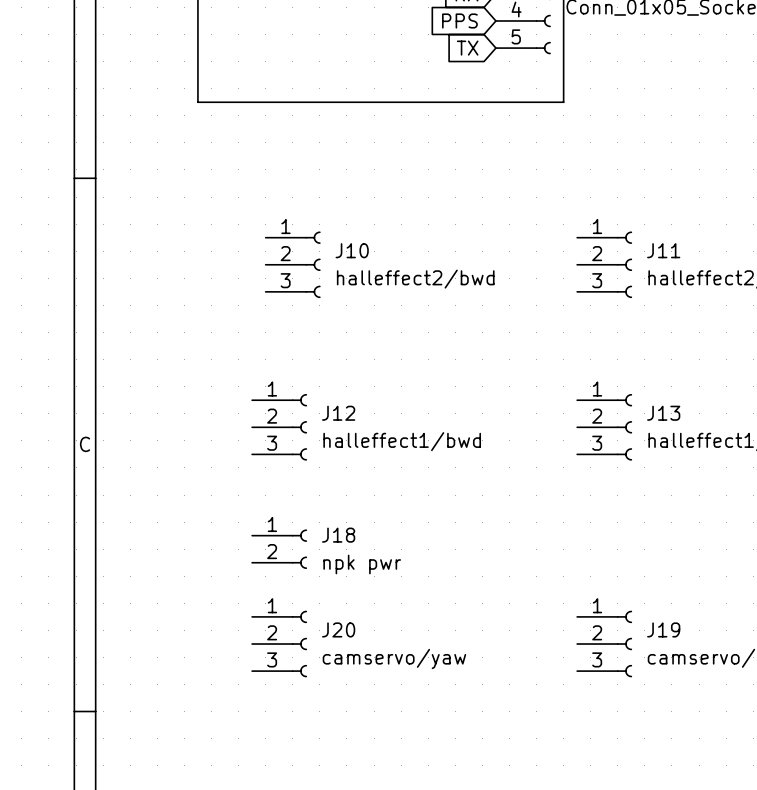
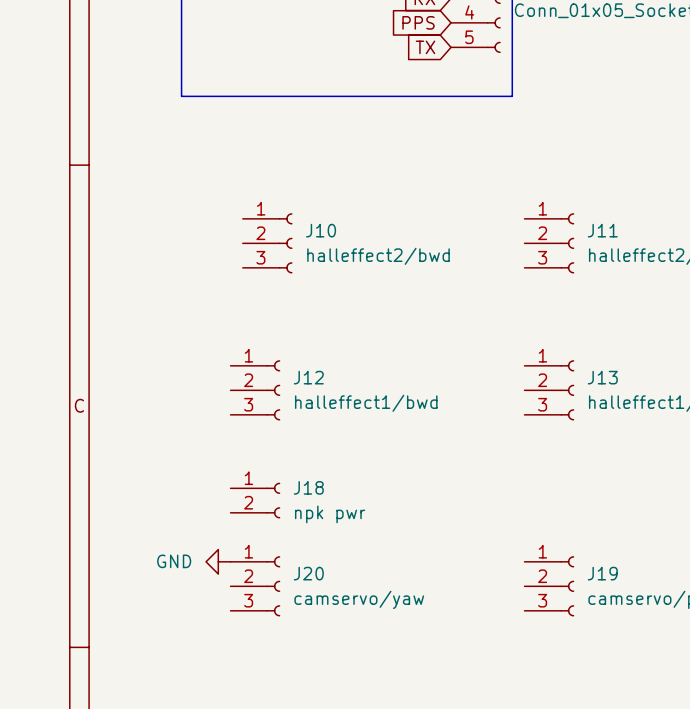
power symbol: none -> GND (218, 561)

